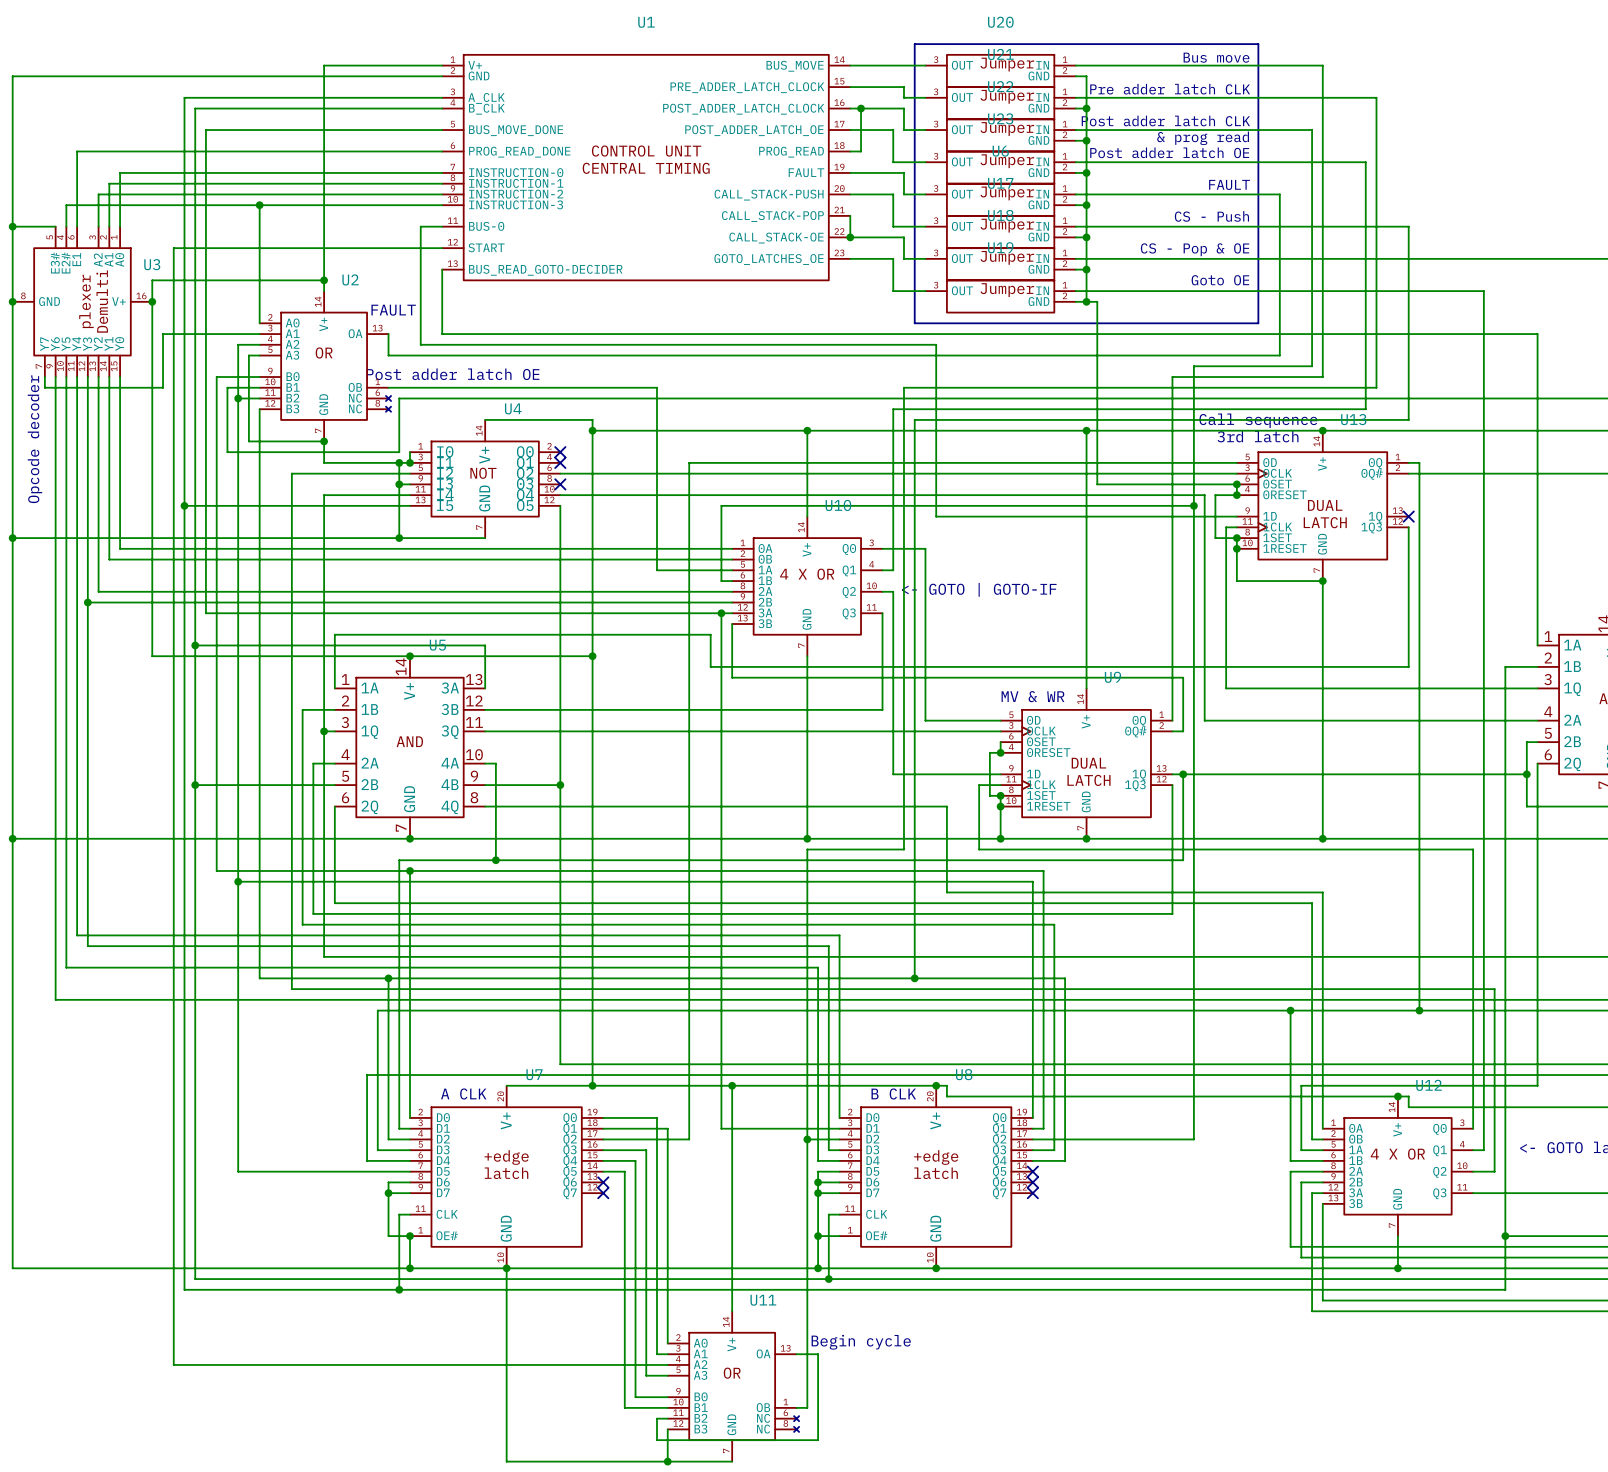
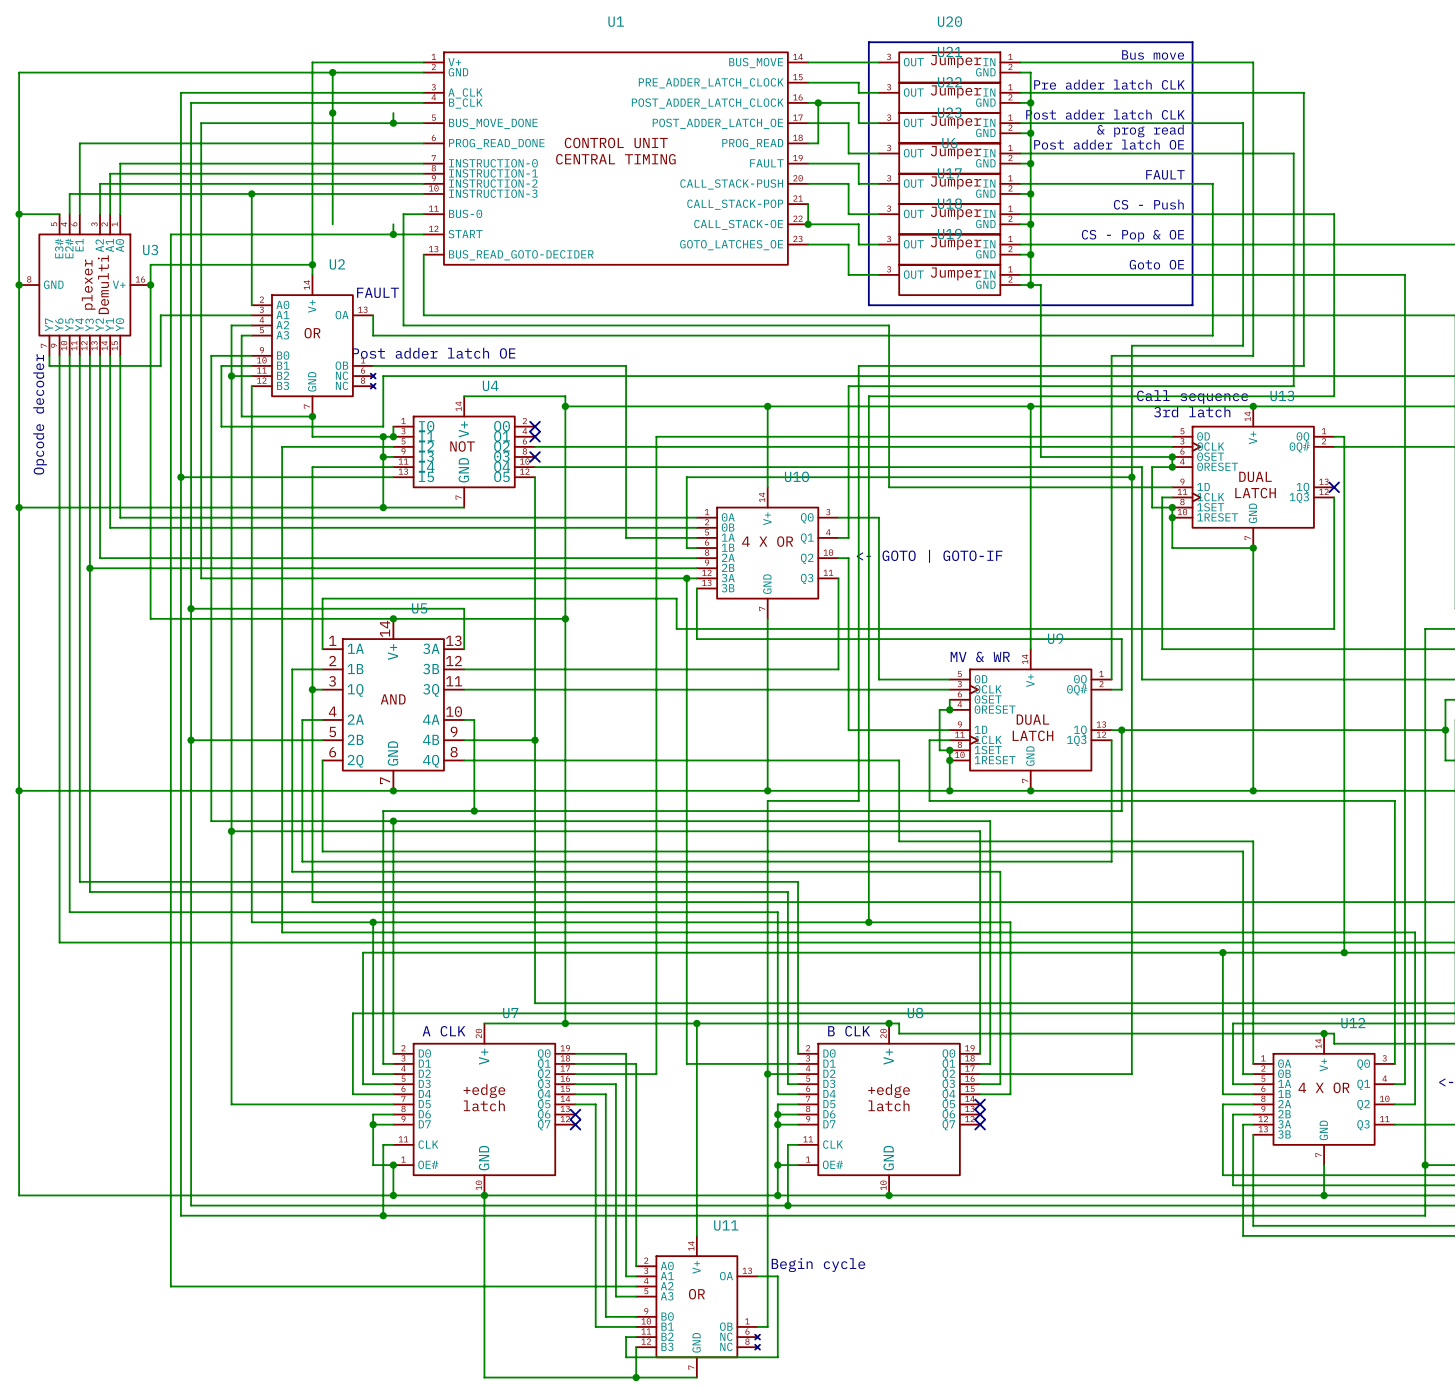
wire: none -> (332, 72) (332, 224)
junction: none -> (332, 72)
junction: none -> (332, 113)
wire: none -> (393, 113) (393, 123)
junction: none -> (393, 123)
wire: none -> (393, 224) (393, 234)
junction: none -> (393, 234)

